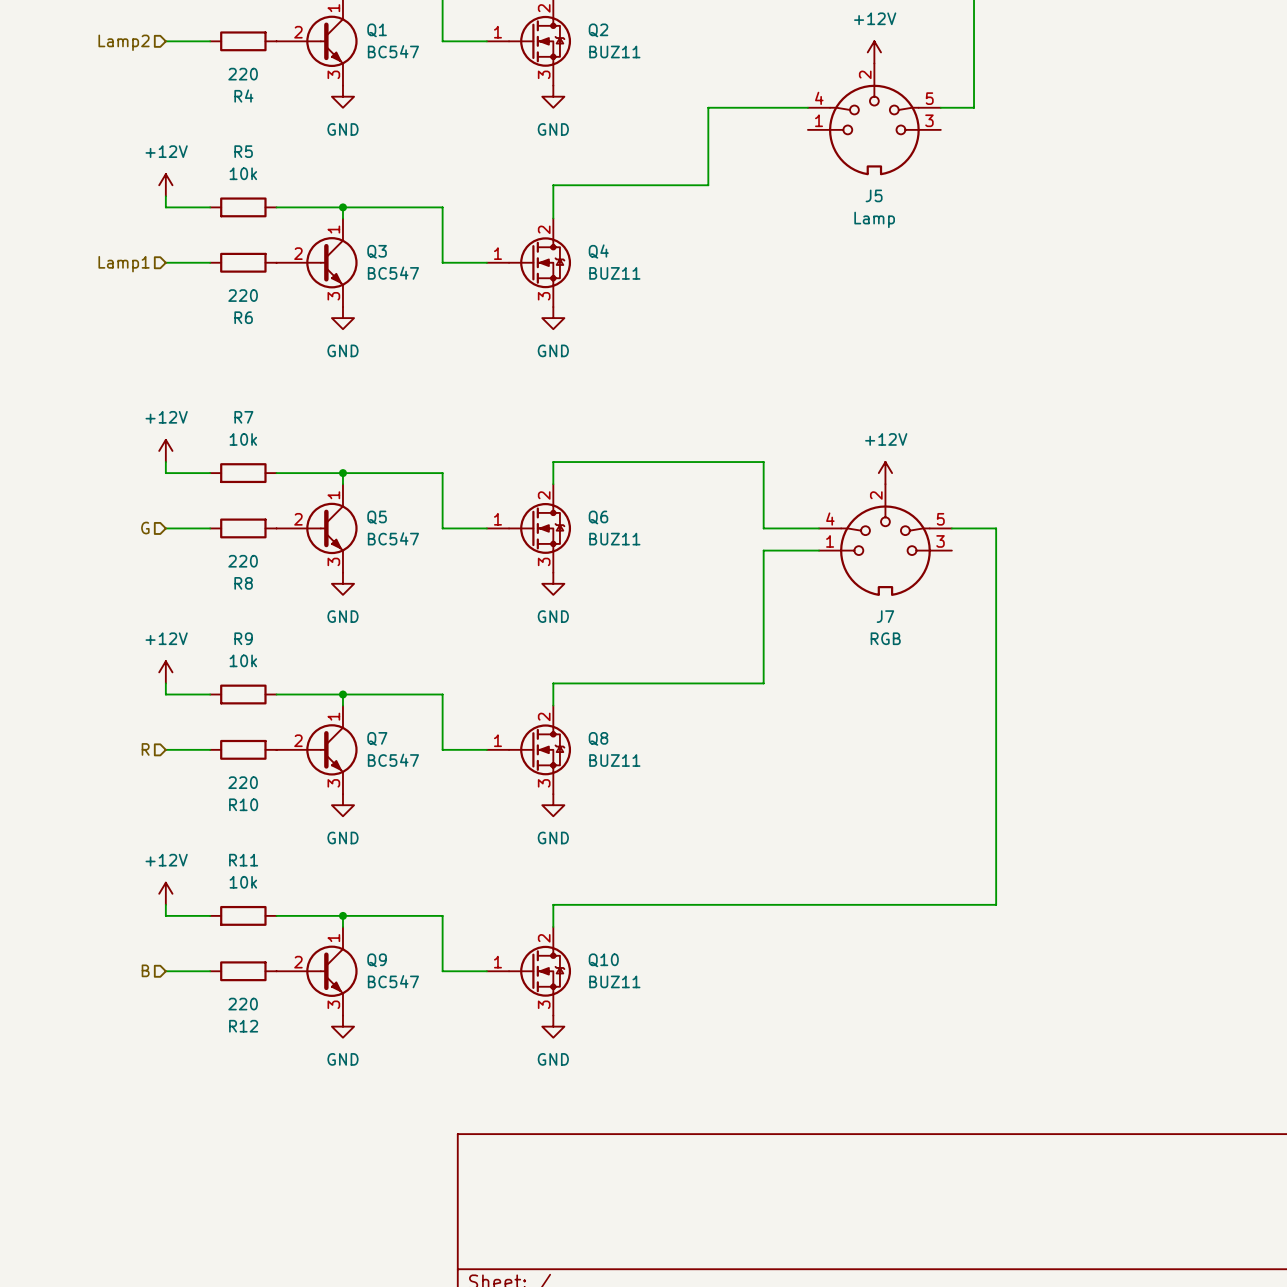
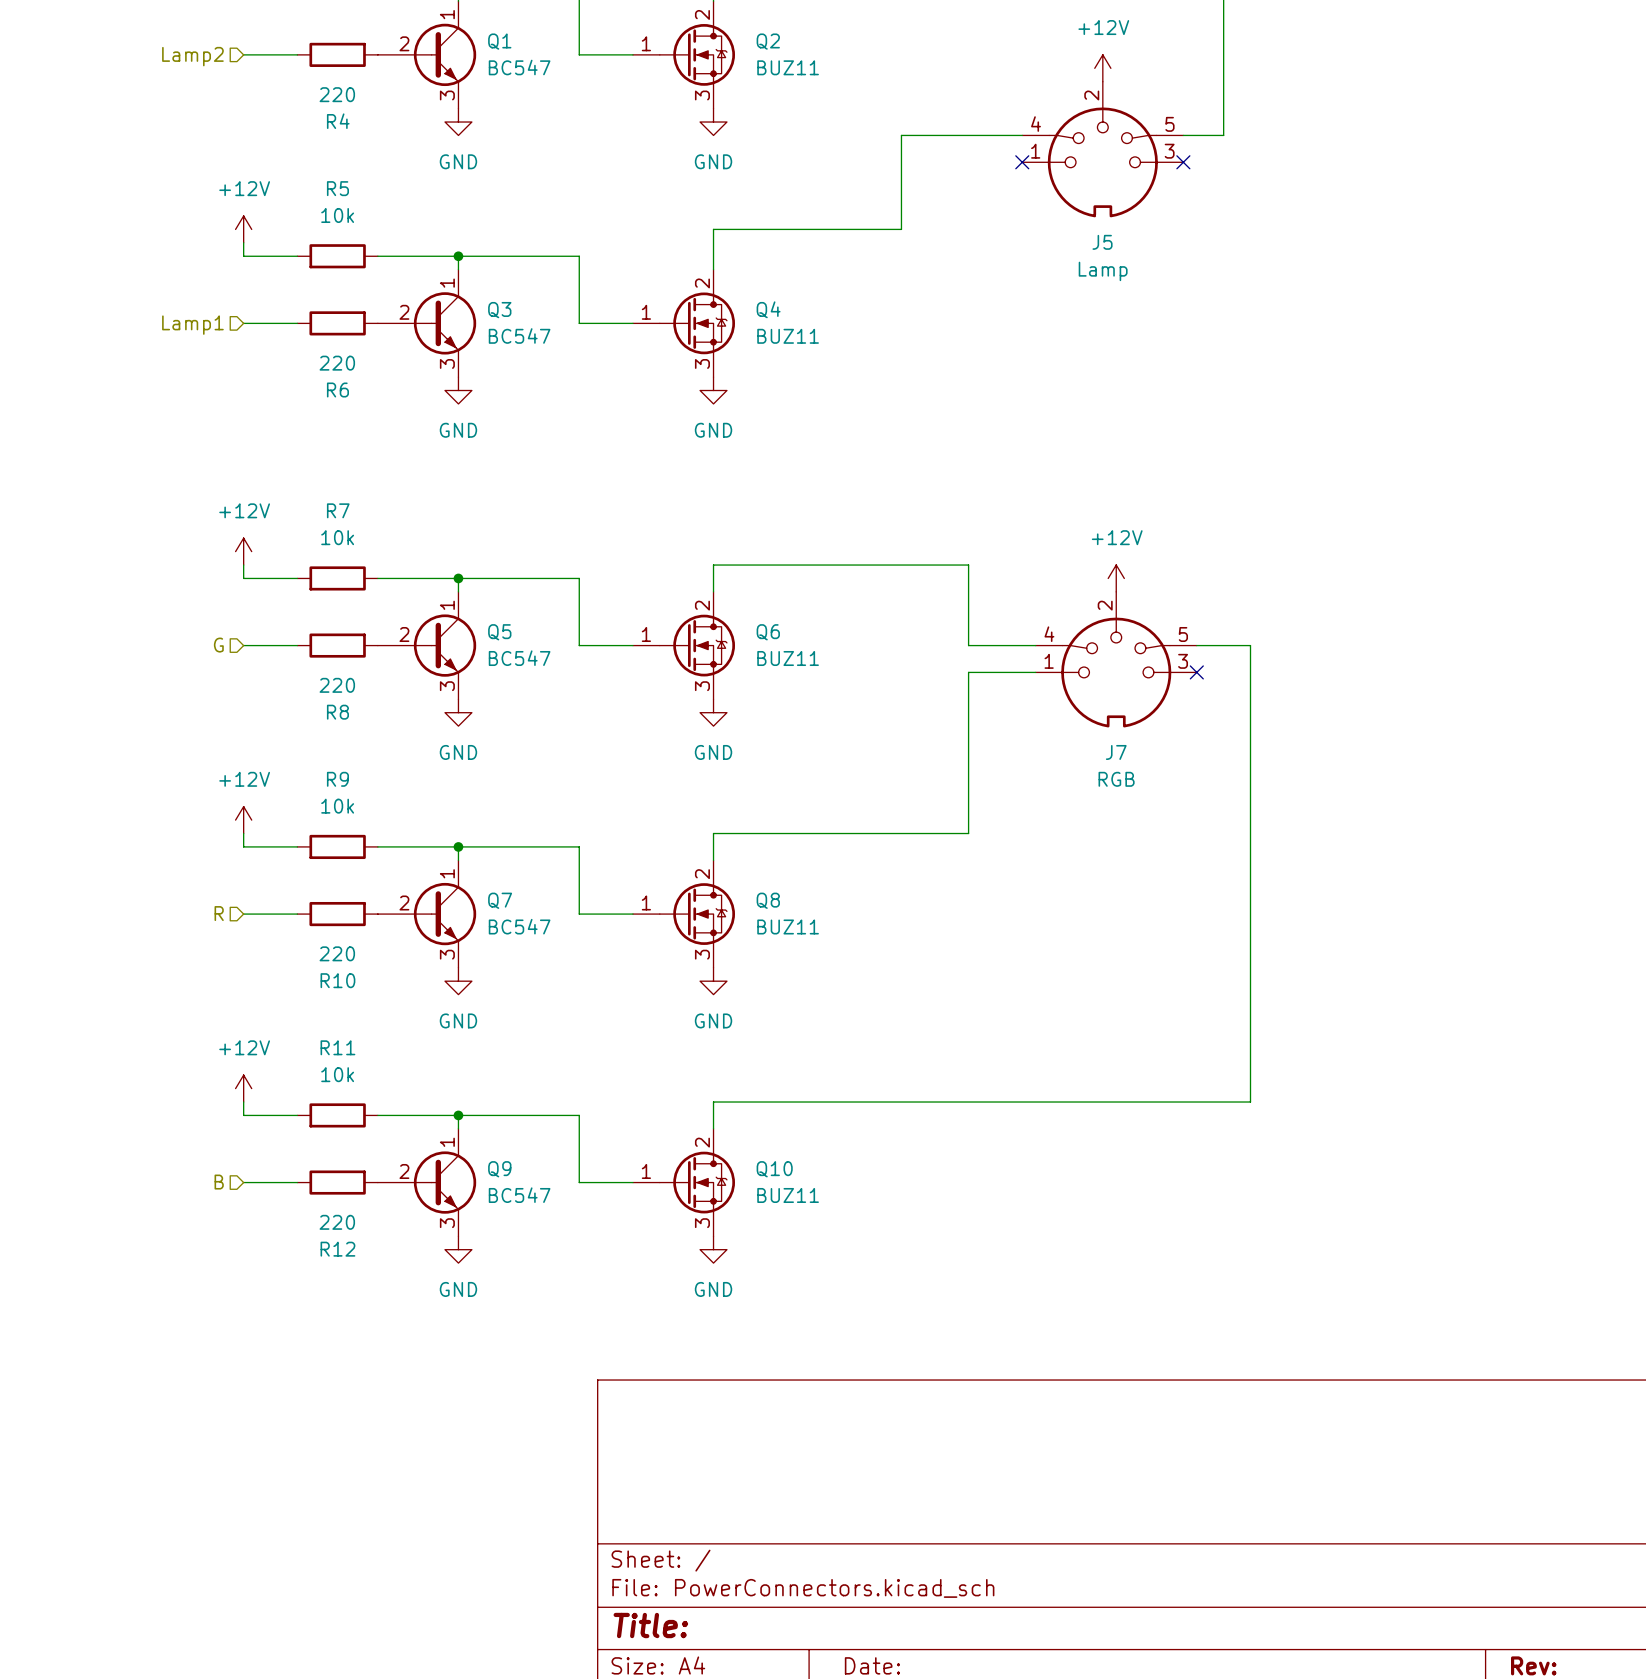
no-connect mark: none -> (1022, 162)
no-connect mark: none -> (1183, 162)
no-connect mark: none -> (1196, 672)

